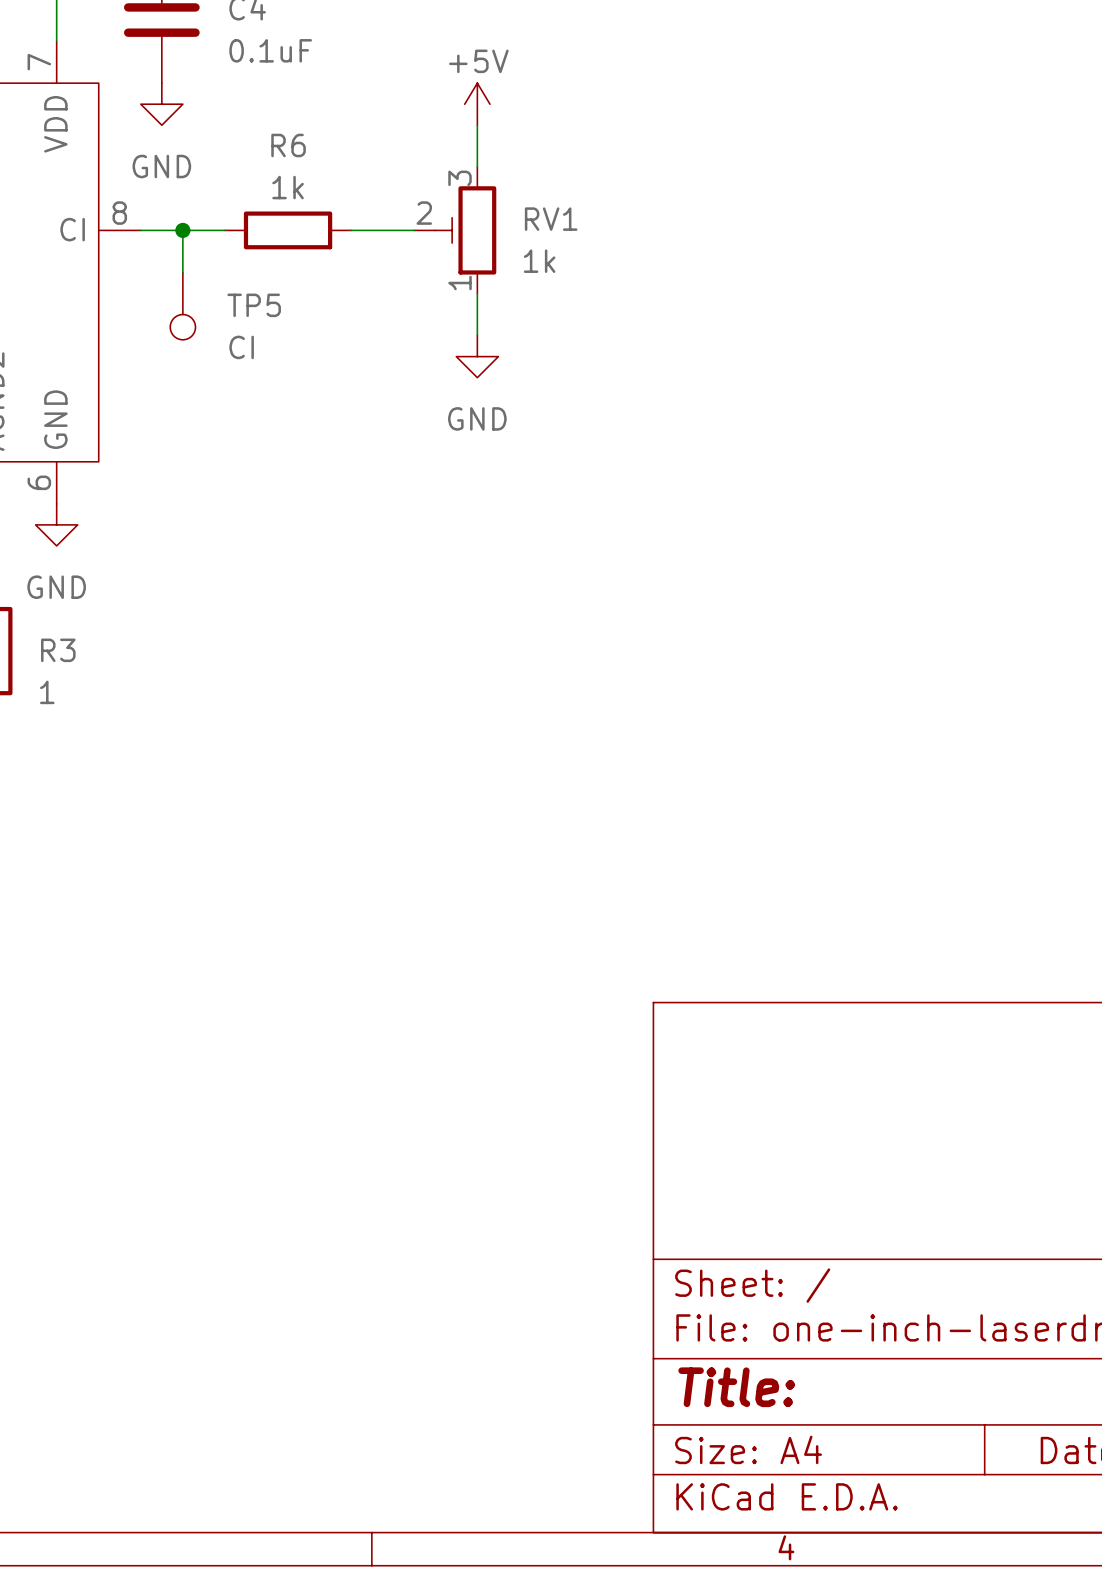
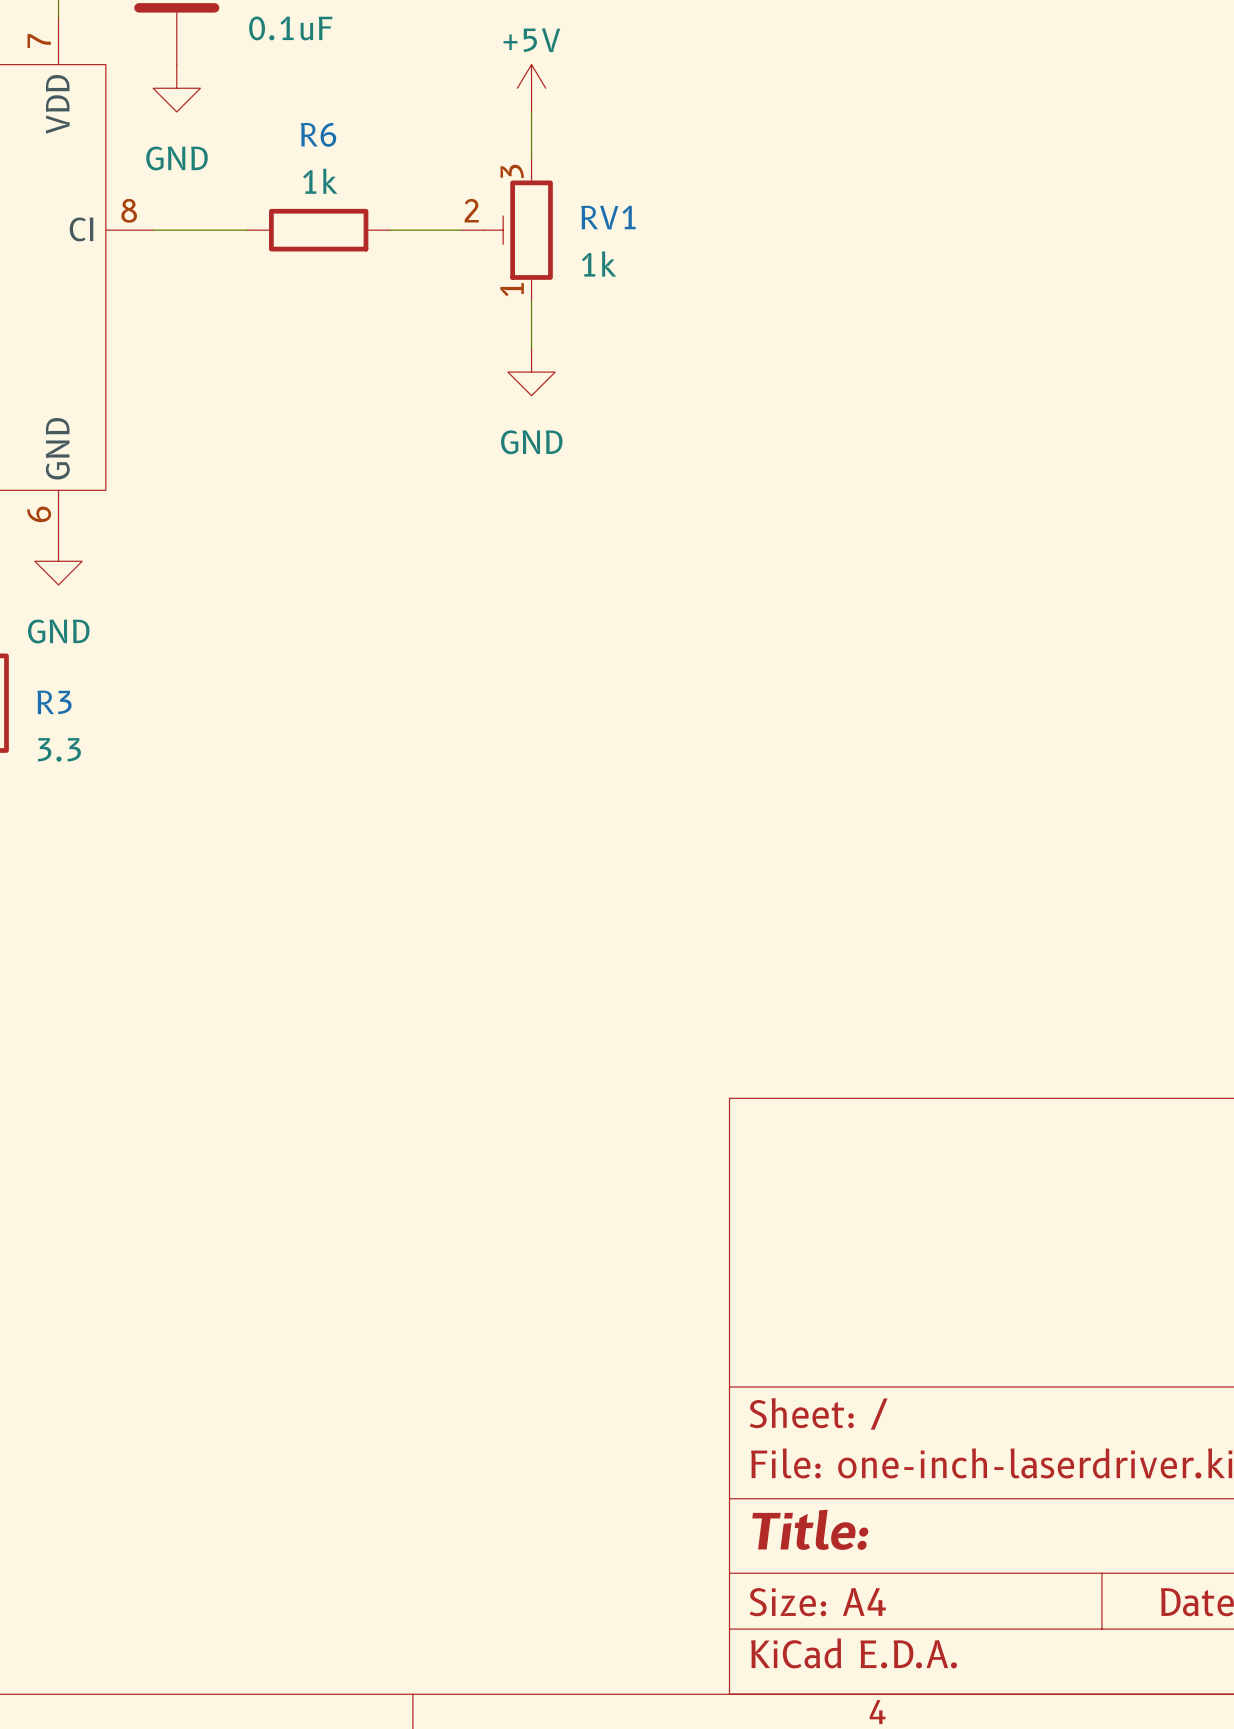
wire: (182, 230) (182, 272) -> none
junction: (182, 230) -> none
TP5: CI (182, 306) -> none
R3 value: 1 (47, 692) -> 3.3 (59, 749)

